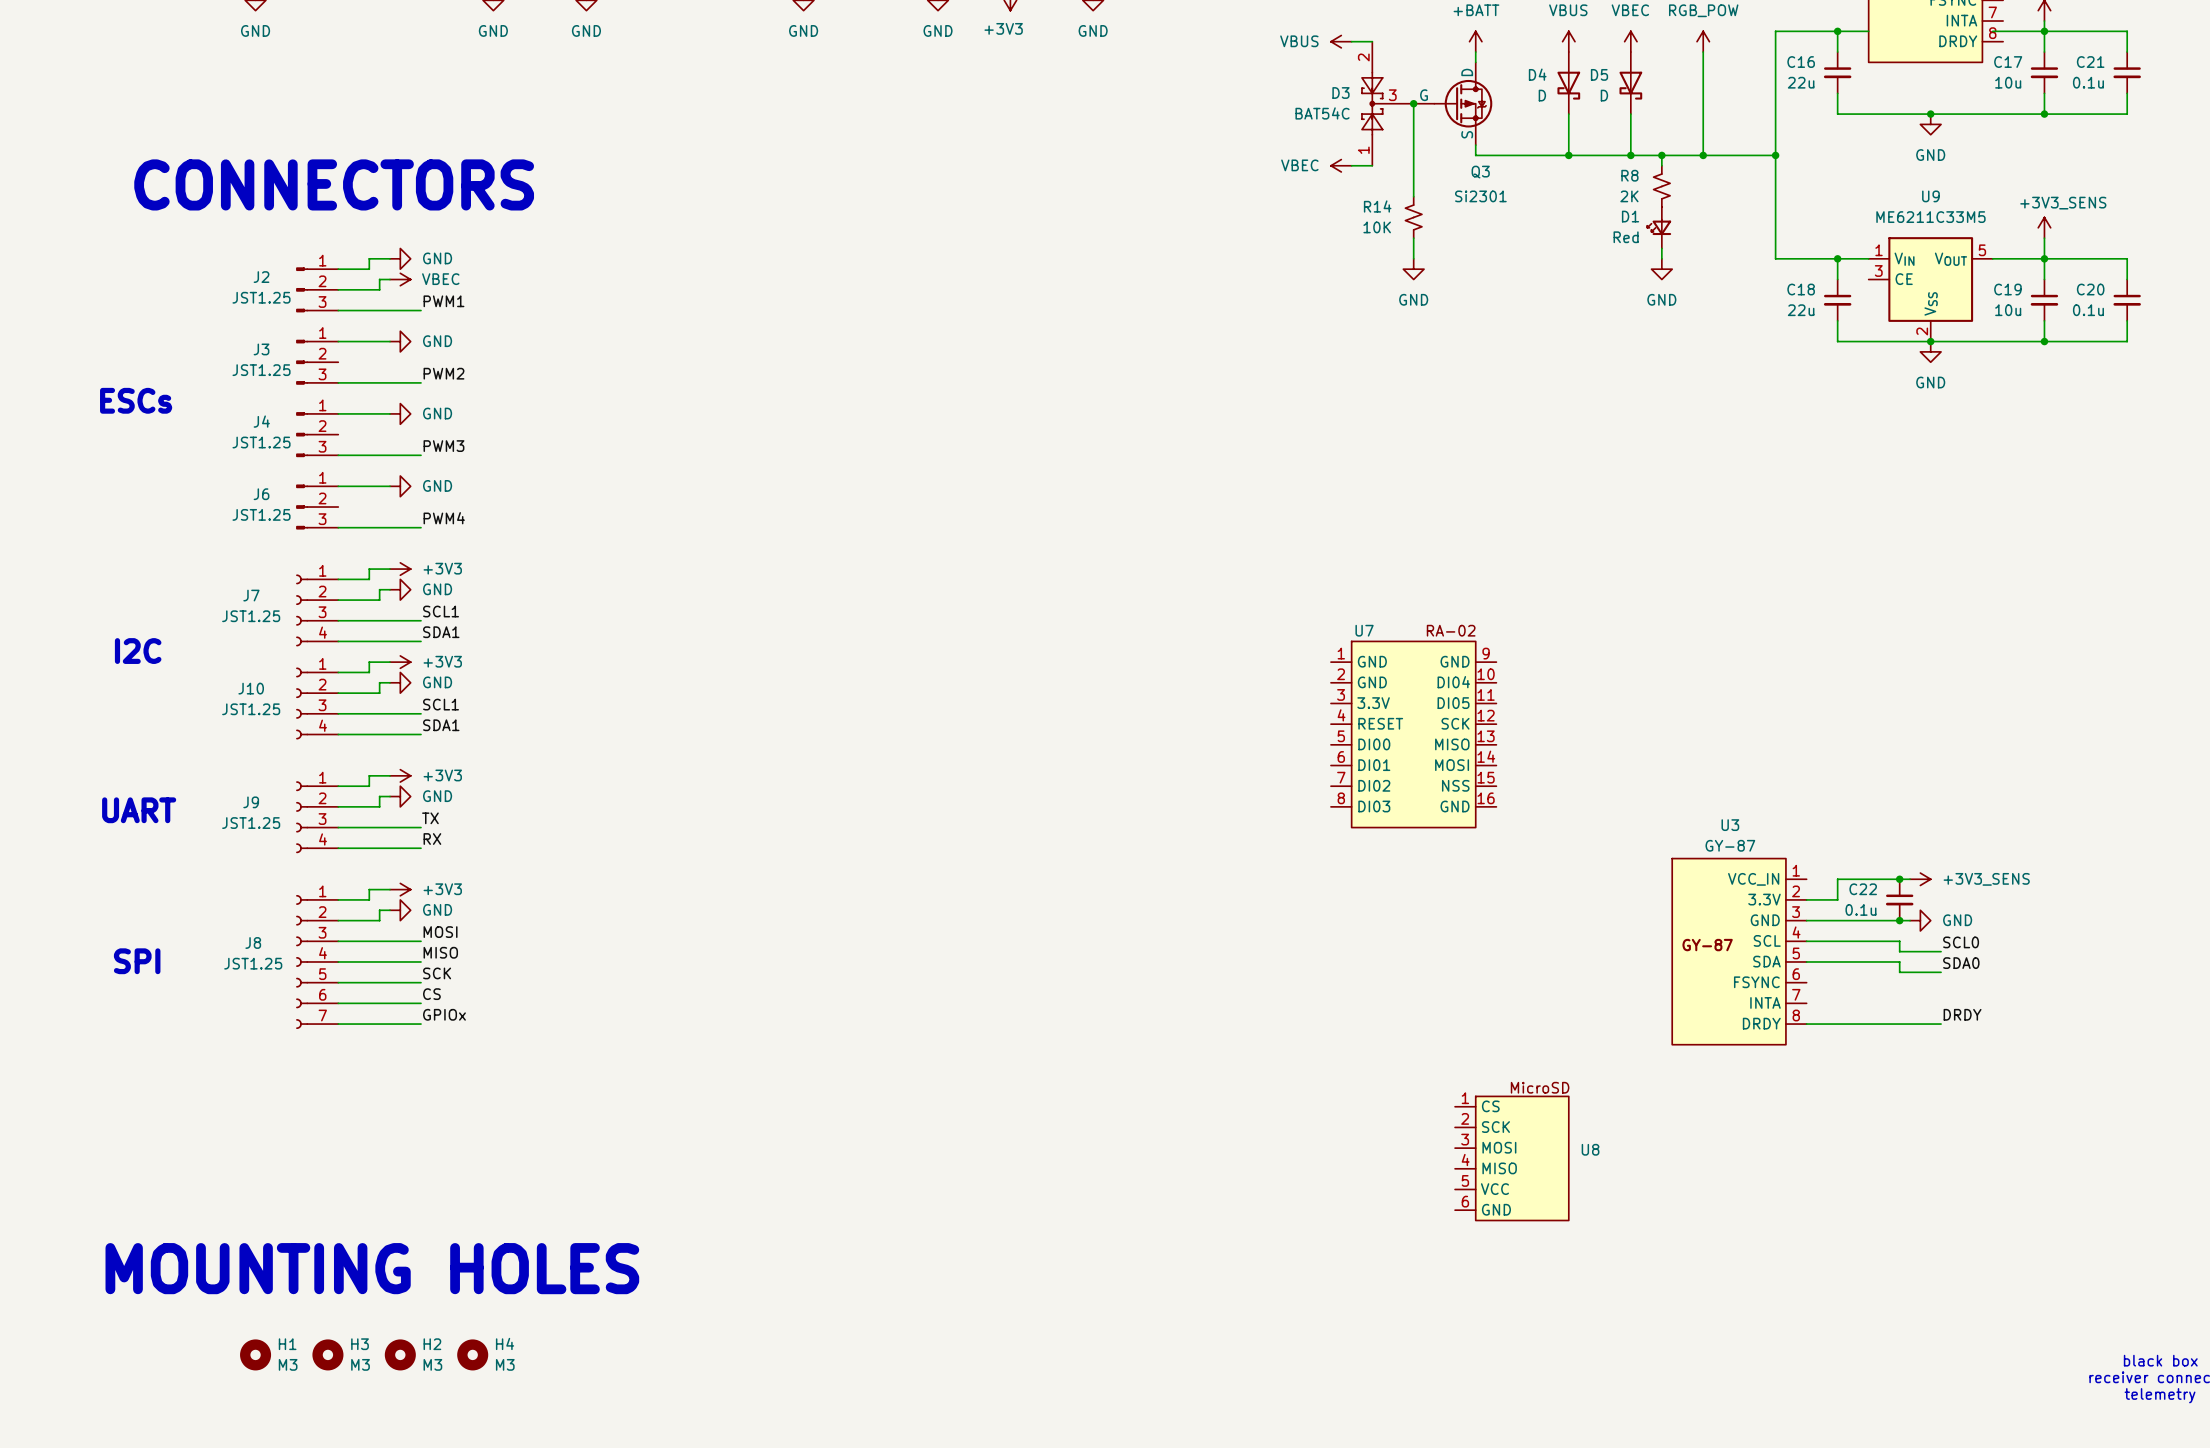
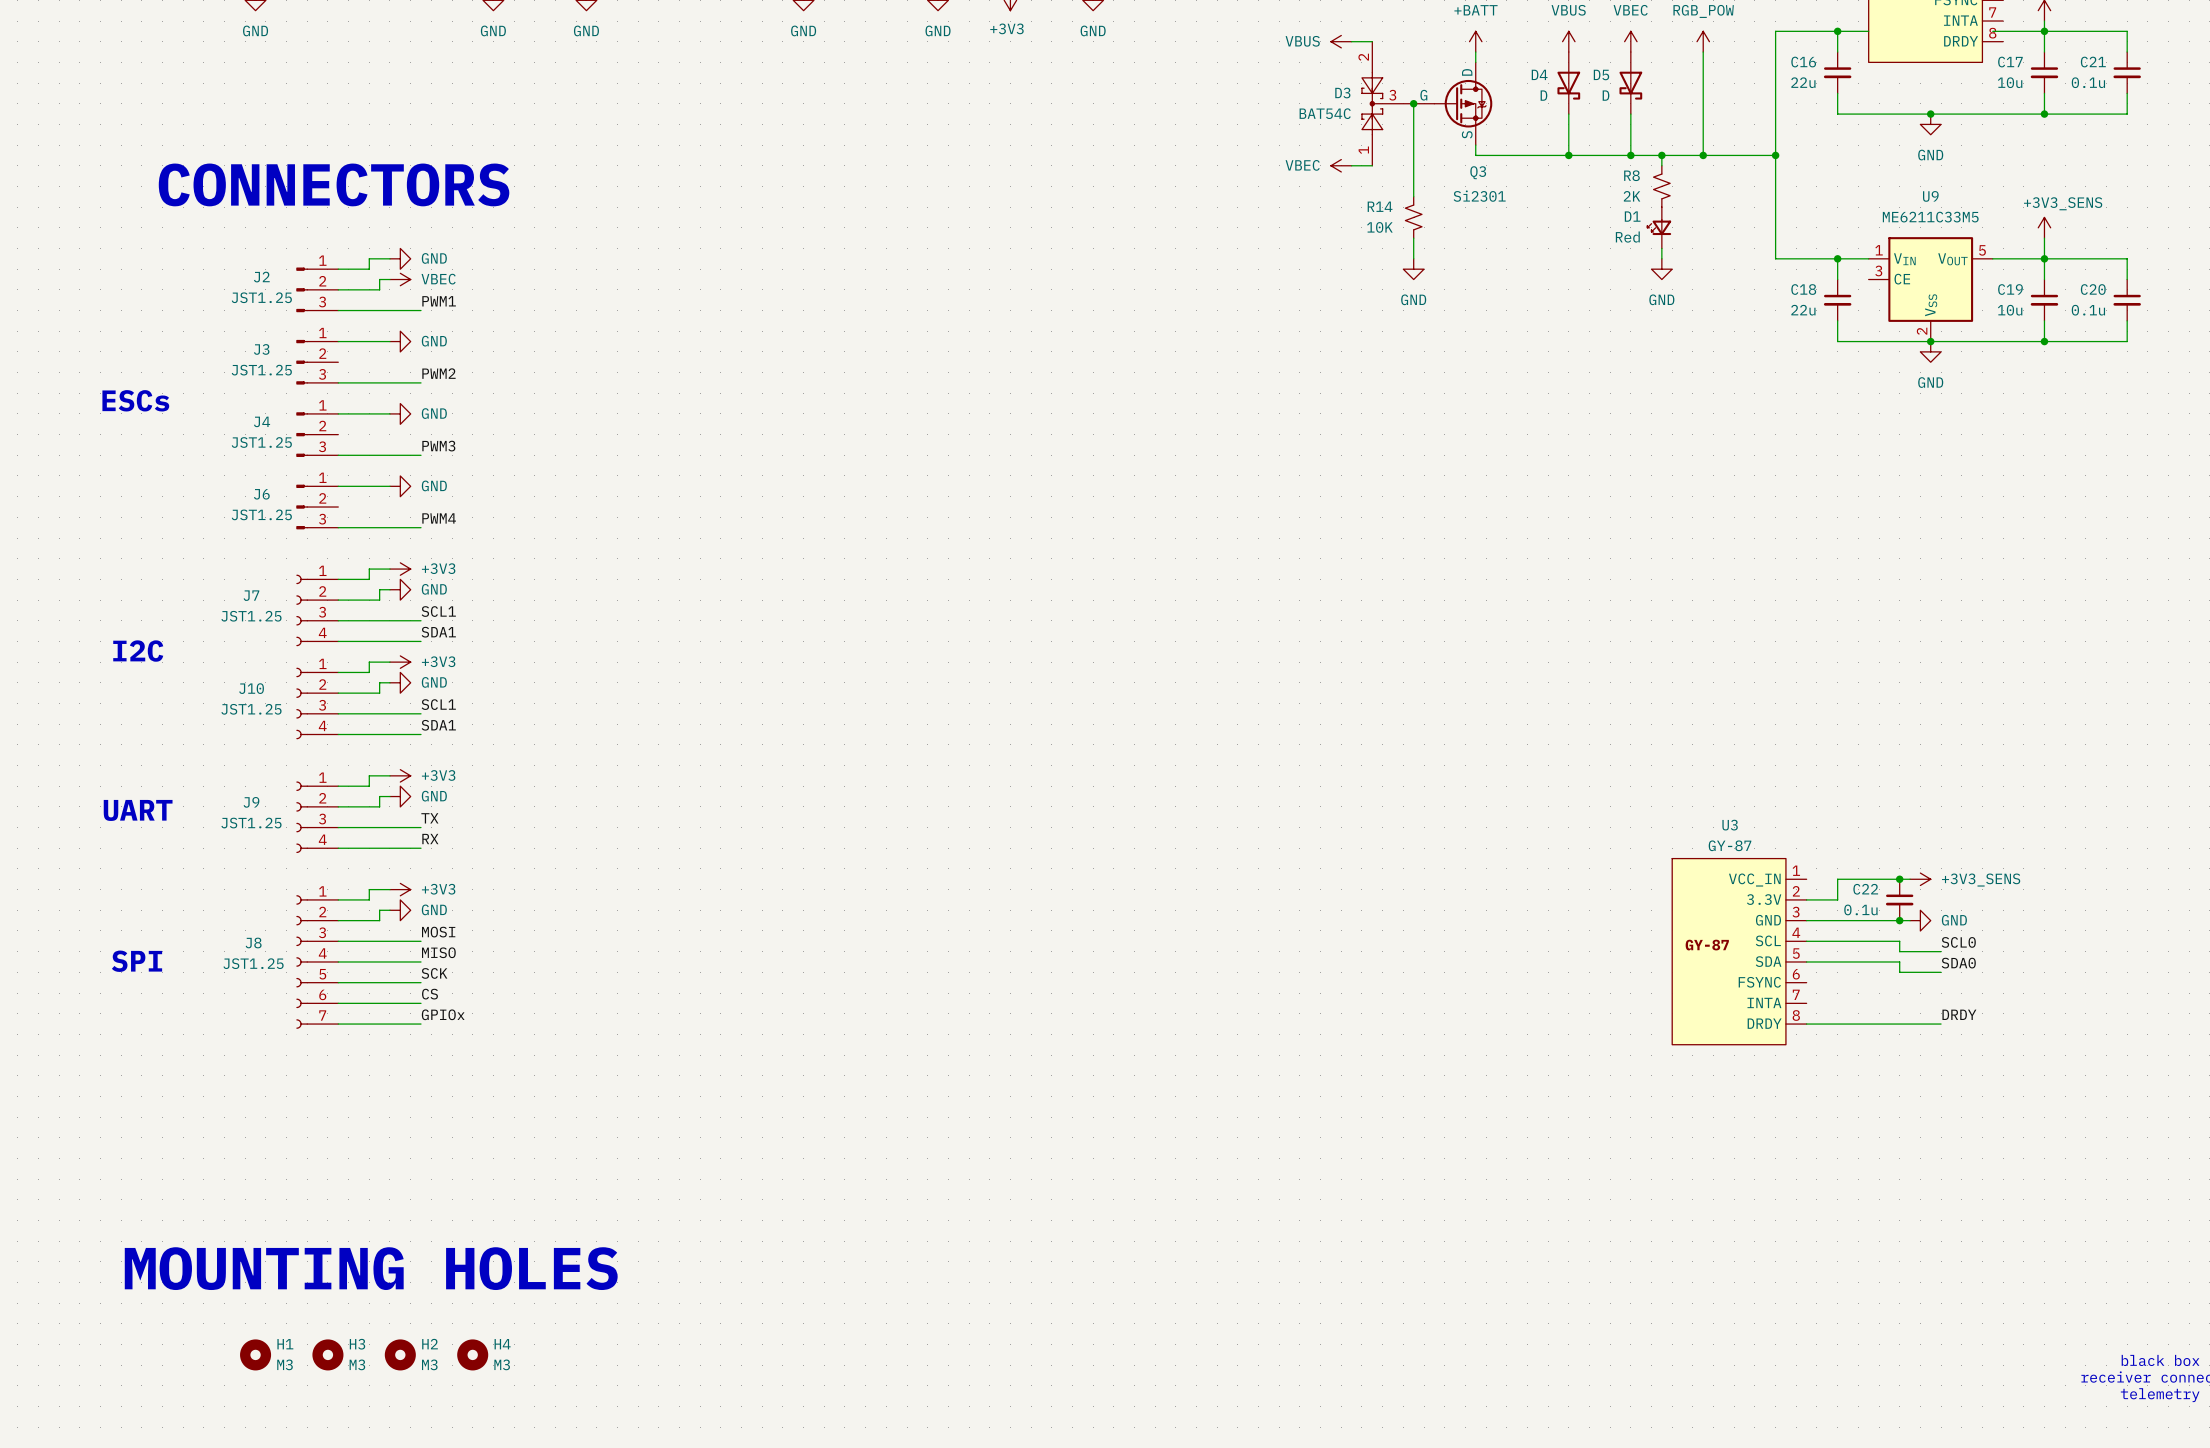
U7: (1413, 734) -> none
U8: (1511, 1158) -> none

